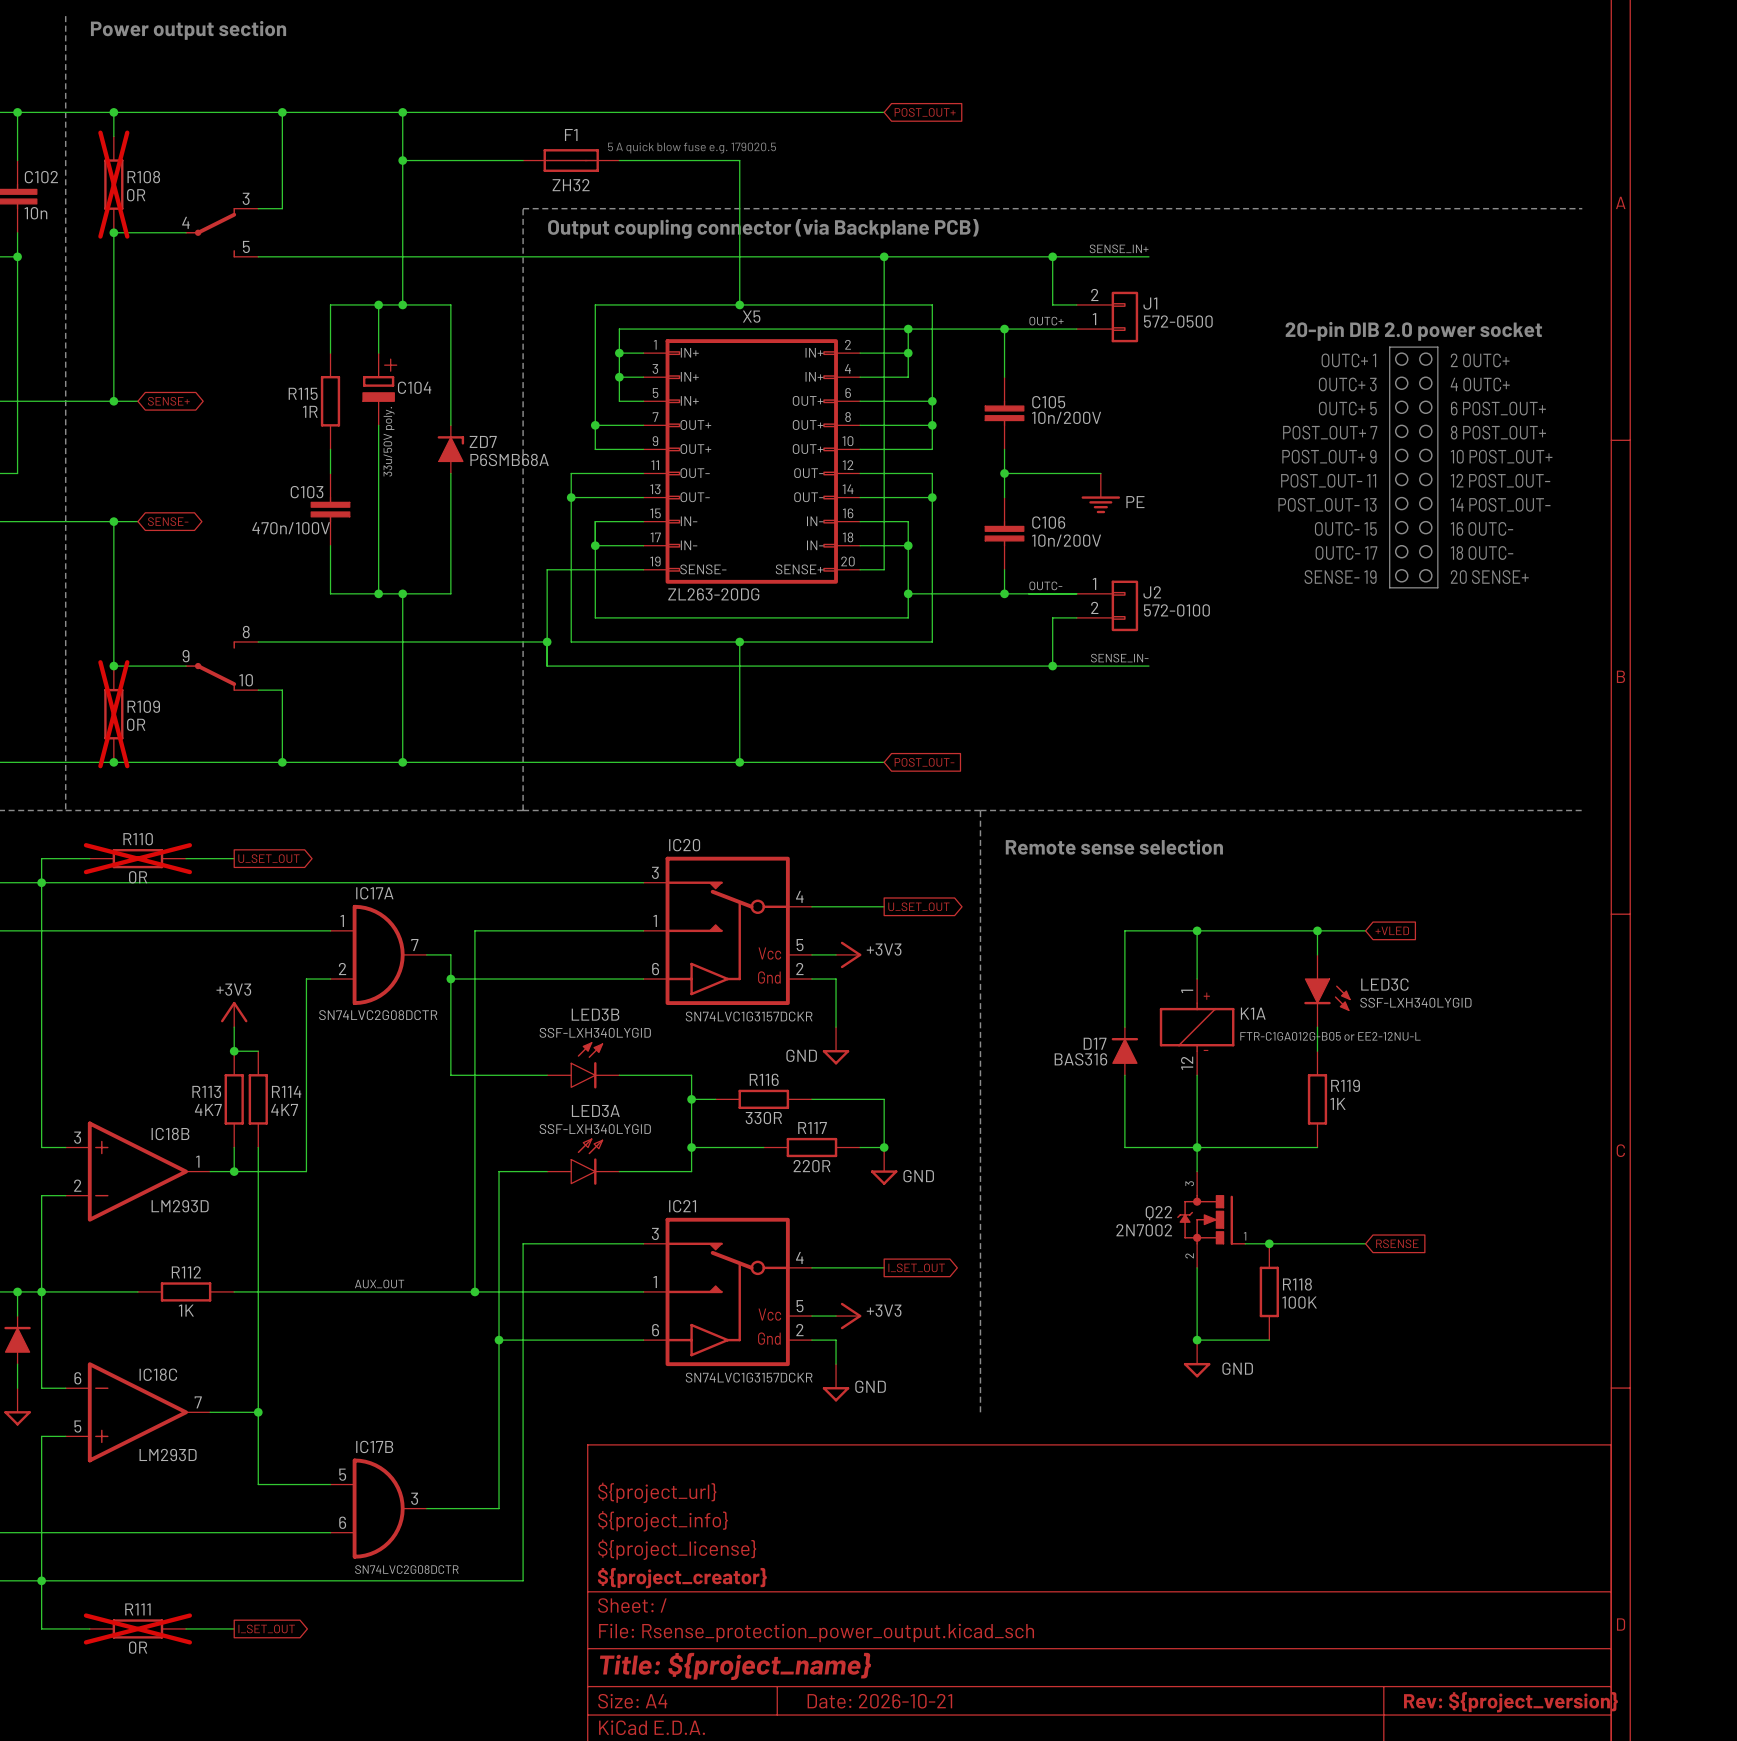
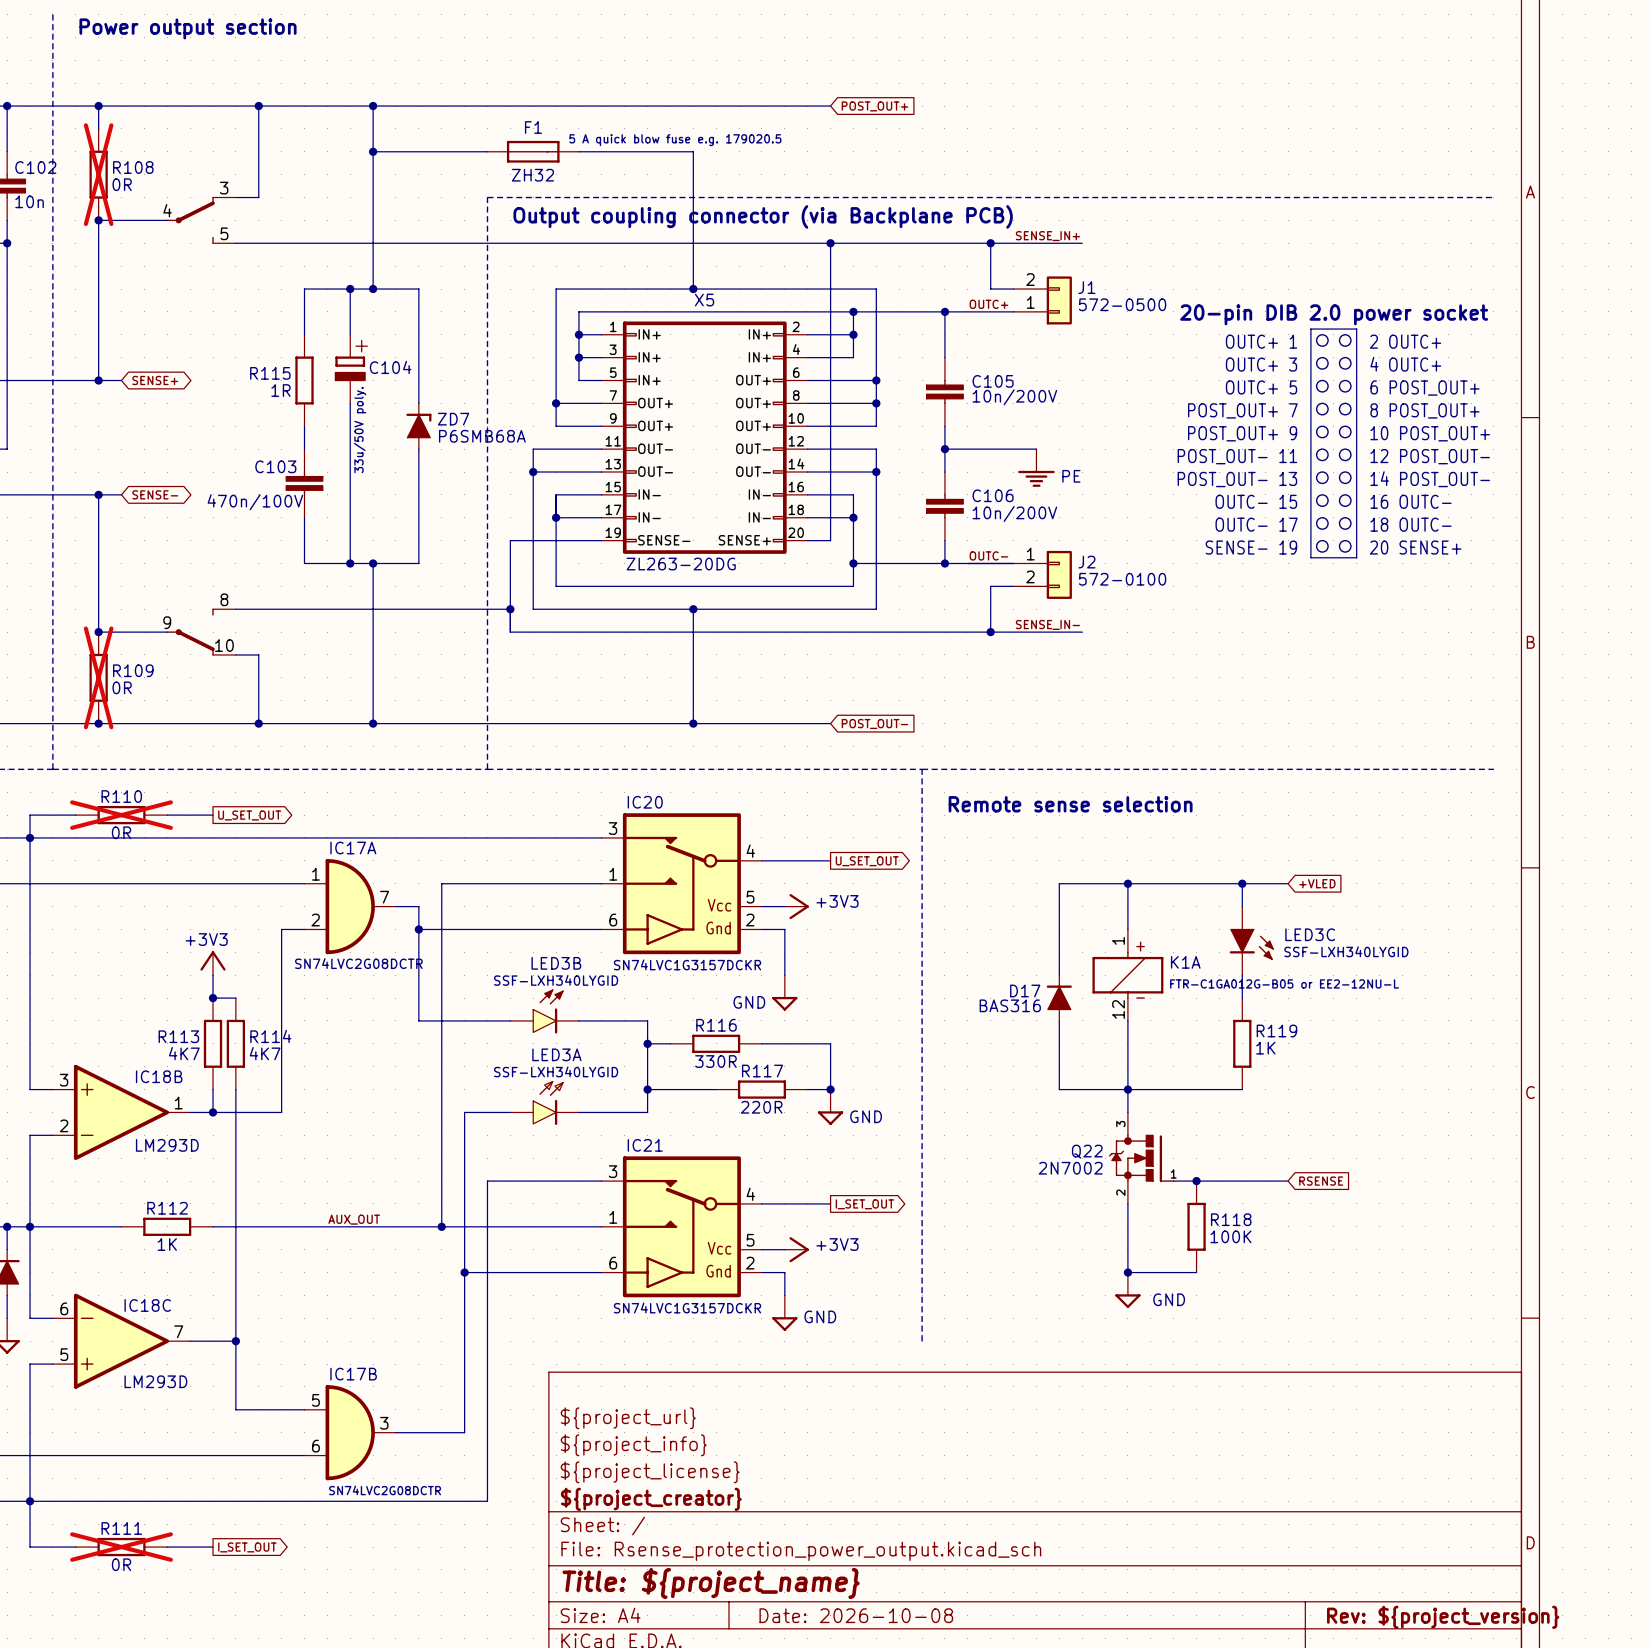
title block: Date: 2026-10-21 (879, 1701) -> Date: 2026-10-08 (856, 1615)

